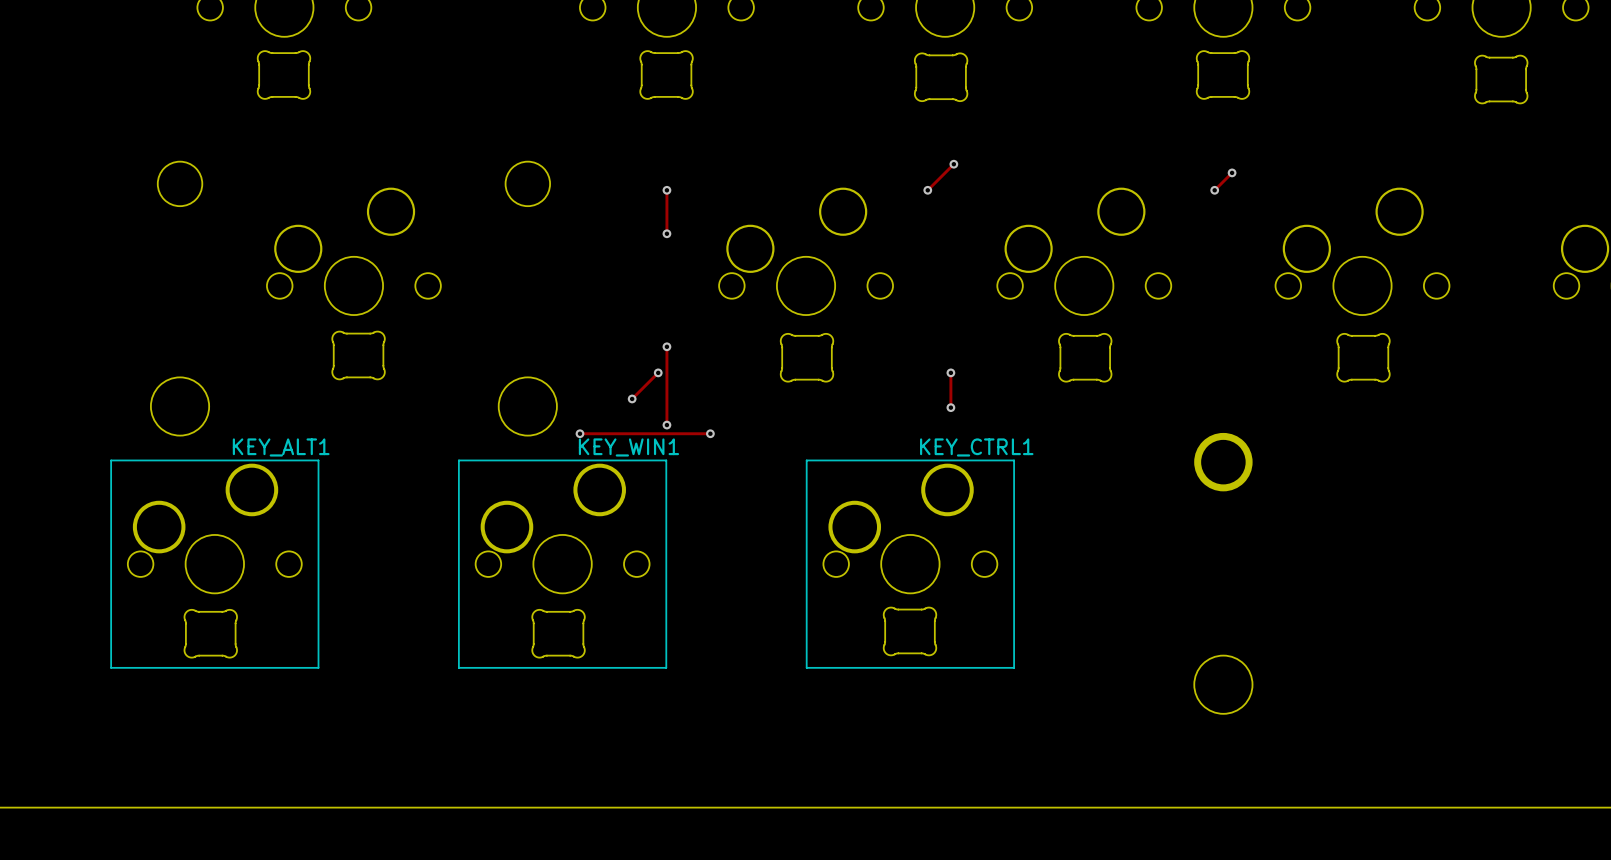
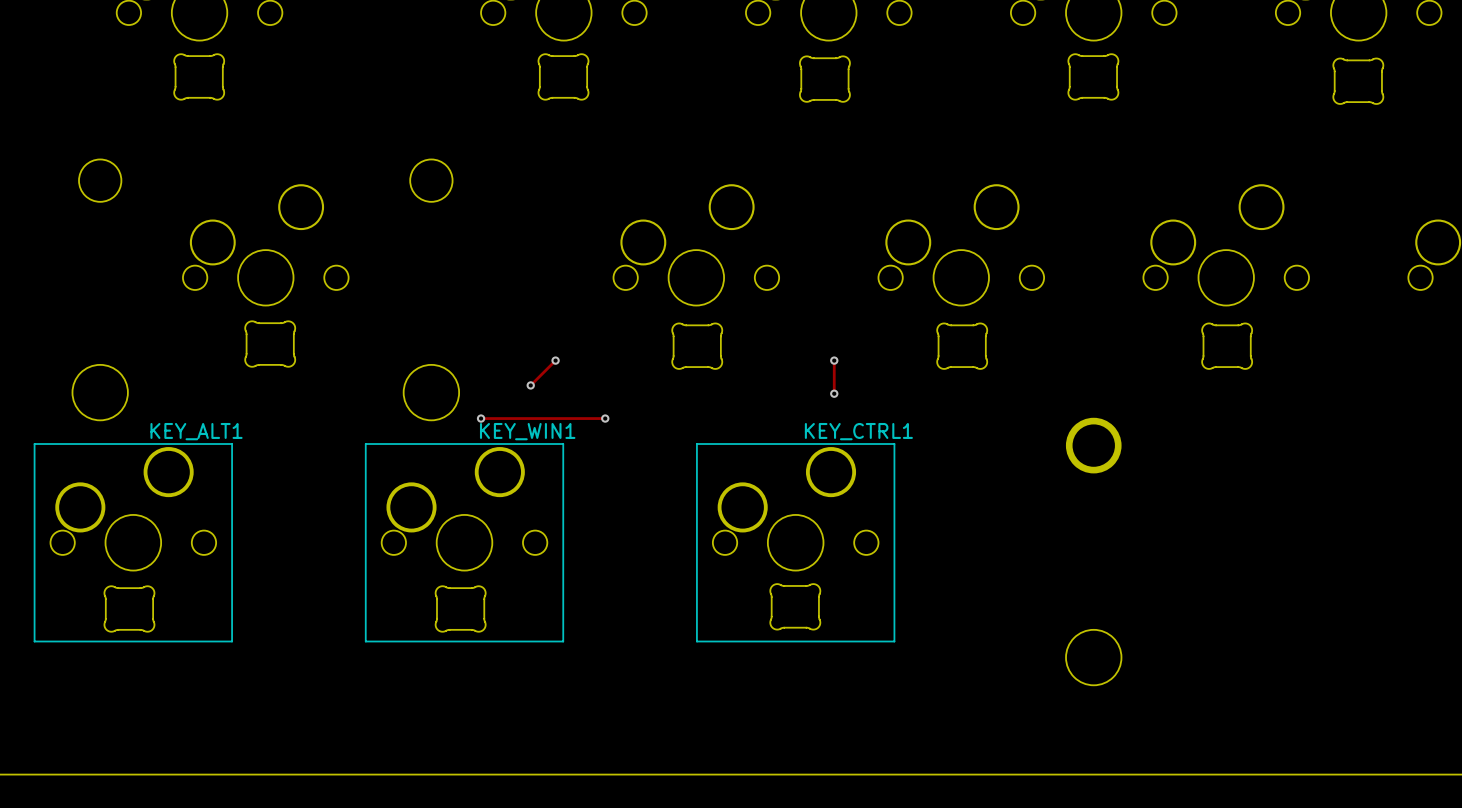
track: (953, 164) (927, 190) -> none
via: (953, 164) -> none
track: (1232, 172) (1214, 190) -> none
via: (1232, 172) -> none
track: (666, 190) (666, 233) -> none
via: (666, 190) -> none
via: (927, 190) -> none
via: (1214, 190) -> none
via: (666, 233) -> none
track: (666, 346) (666, 425) -> none
via: (666, 346) -> none
via: (666, 425) -> none

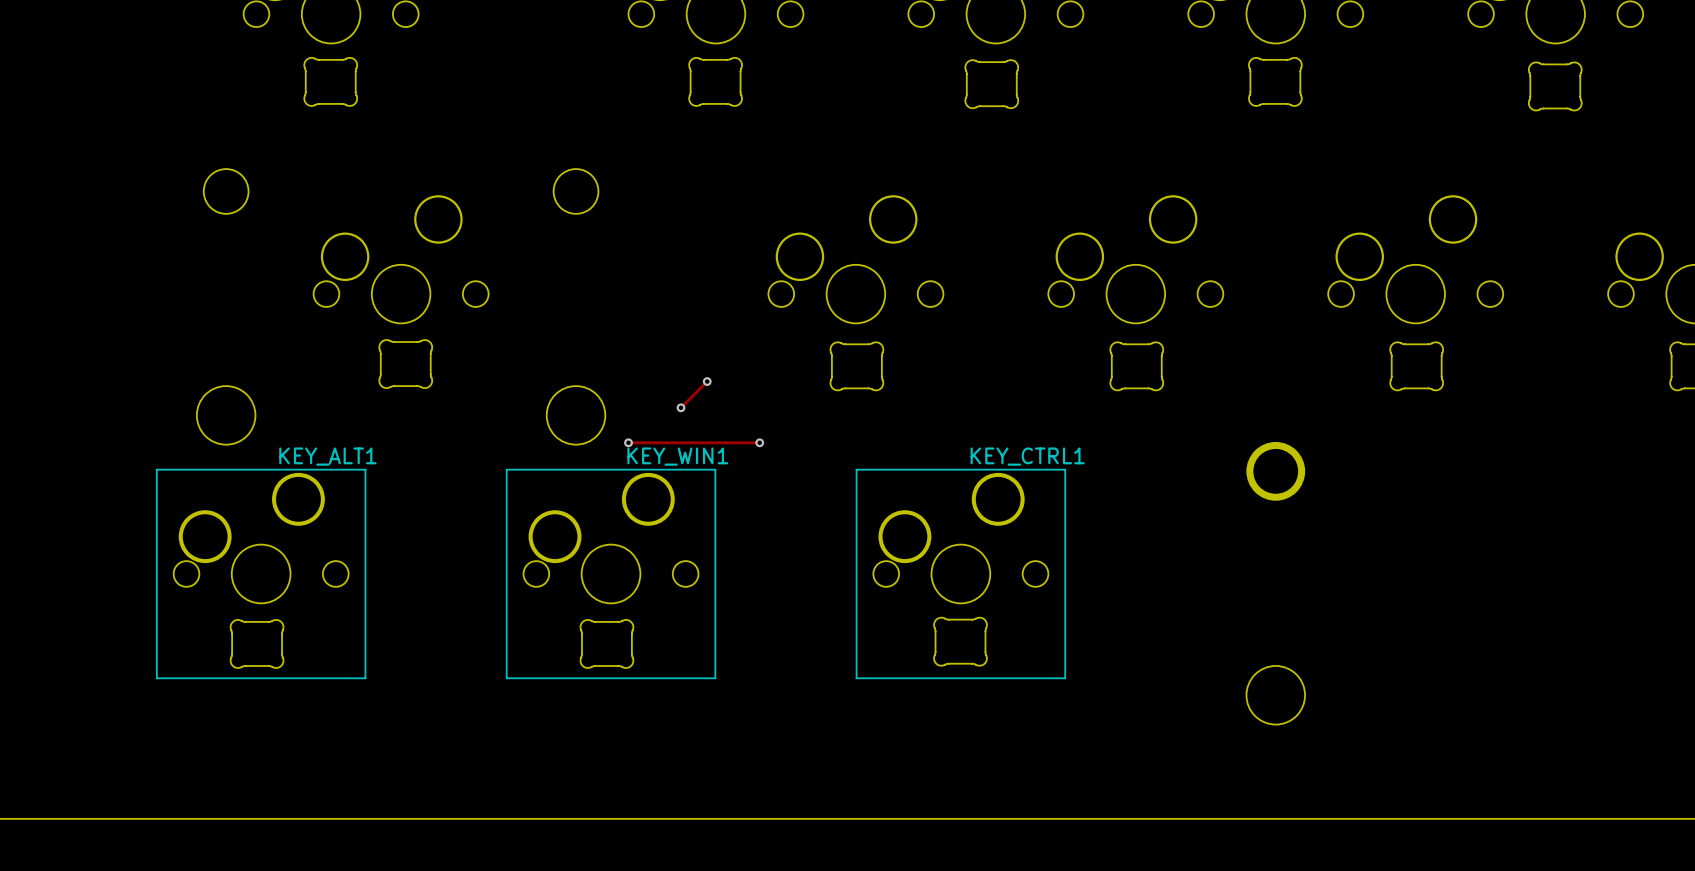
track: (834, 360) (834, 393) -> none
via: (834, 360) -> none
via: (834, 393) -> none

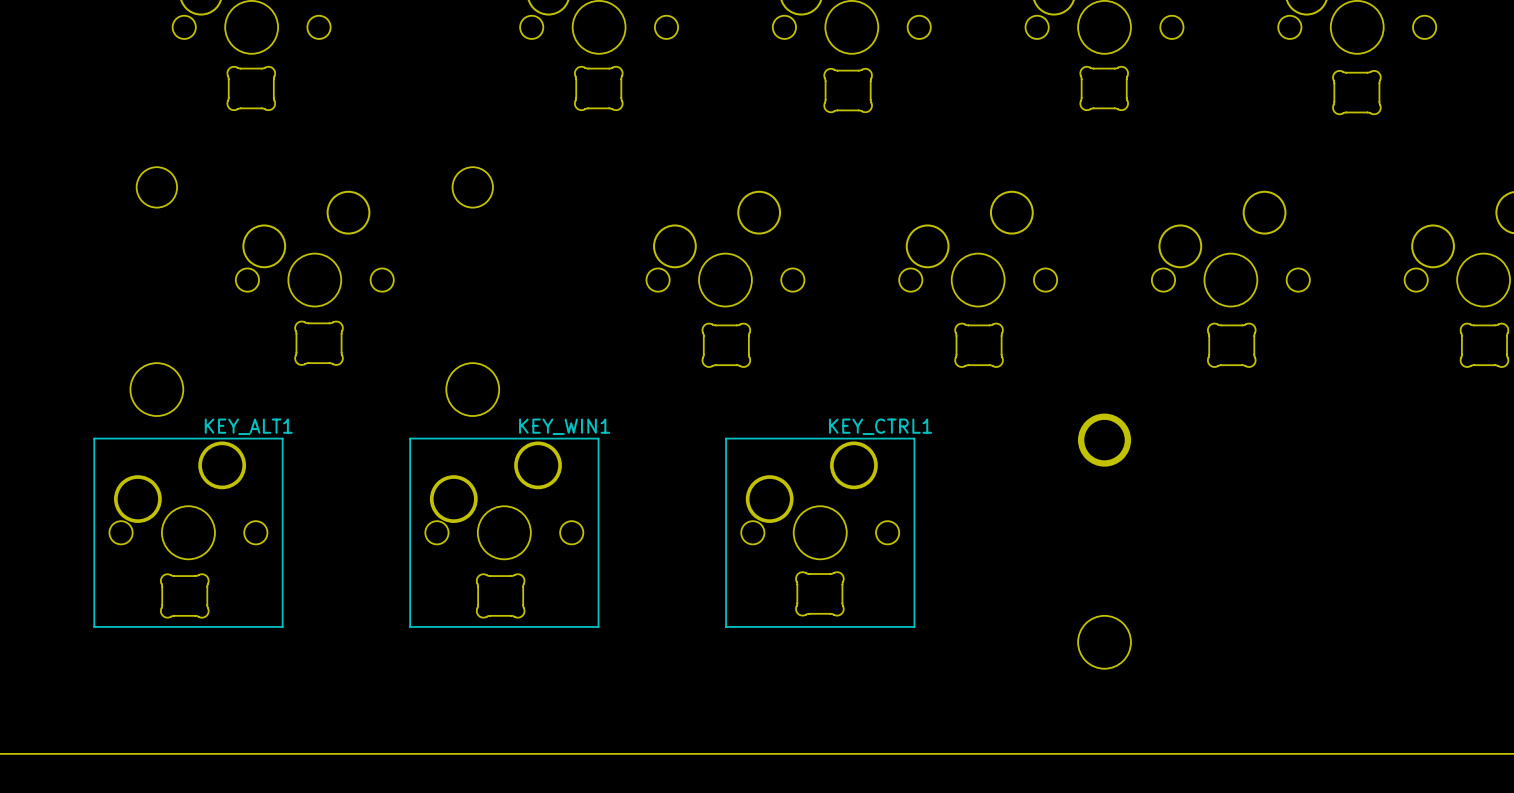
track: (707, 381) (680, 407) -> none
via: (707, 381) -> none
via: (680, 407) -> none
track: (628, 442) (759, 442) -> none
via: (628, 442) -> none
via: (759, 442) -> none

